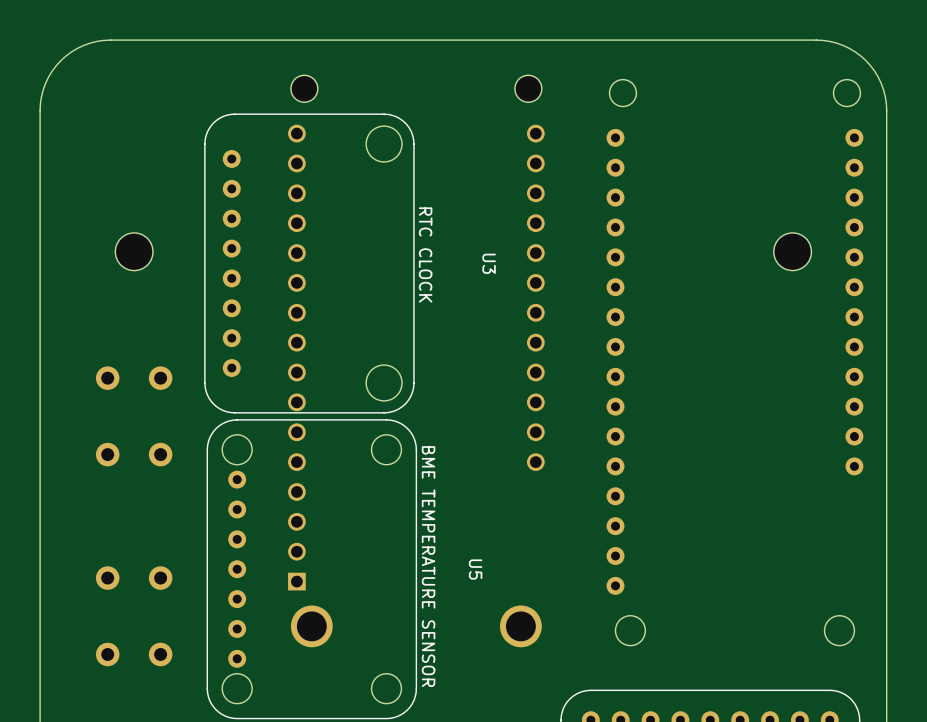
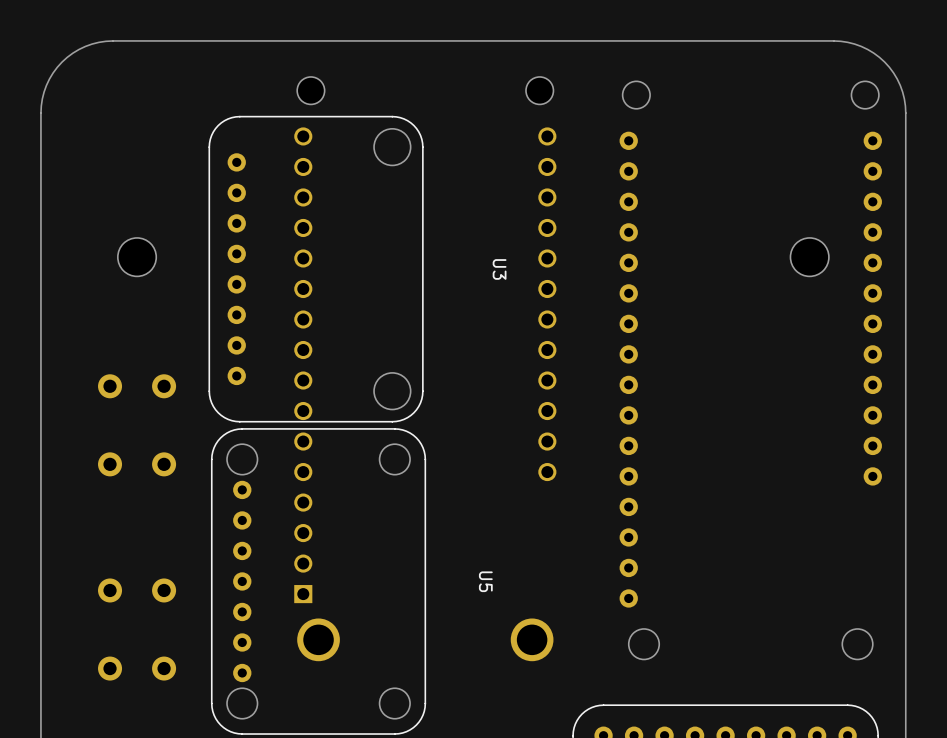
text: RTC CLOCK (425, 254) -> none
text: BME TEMPERATURE SENSOR (428, 566) -> none

